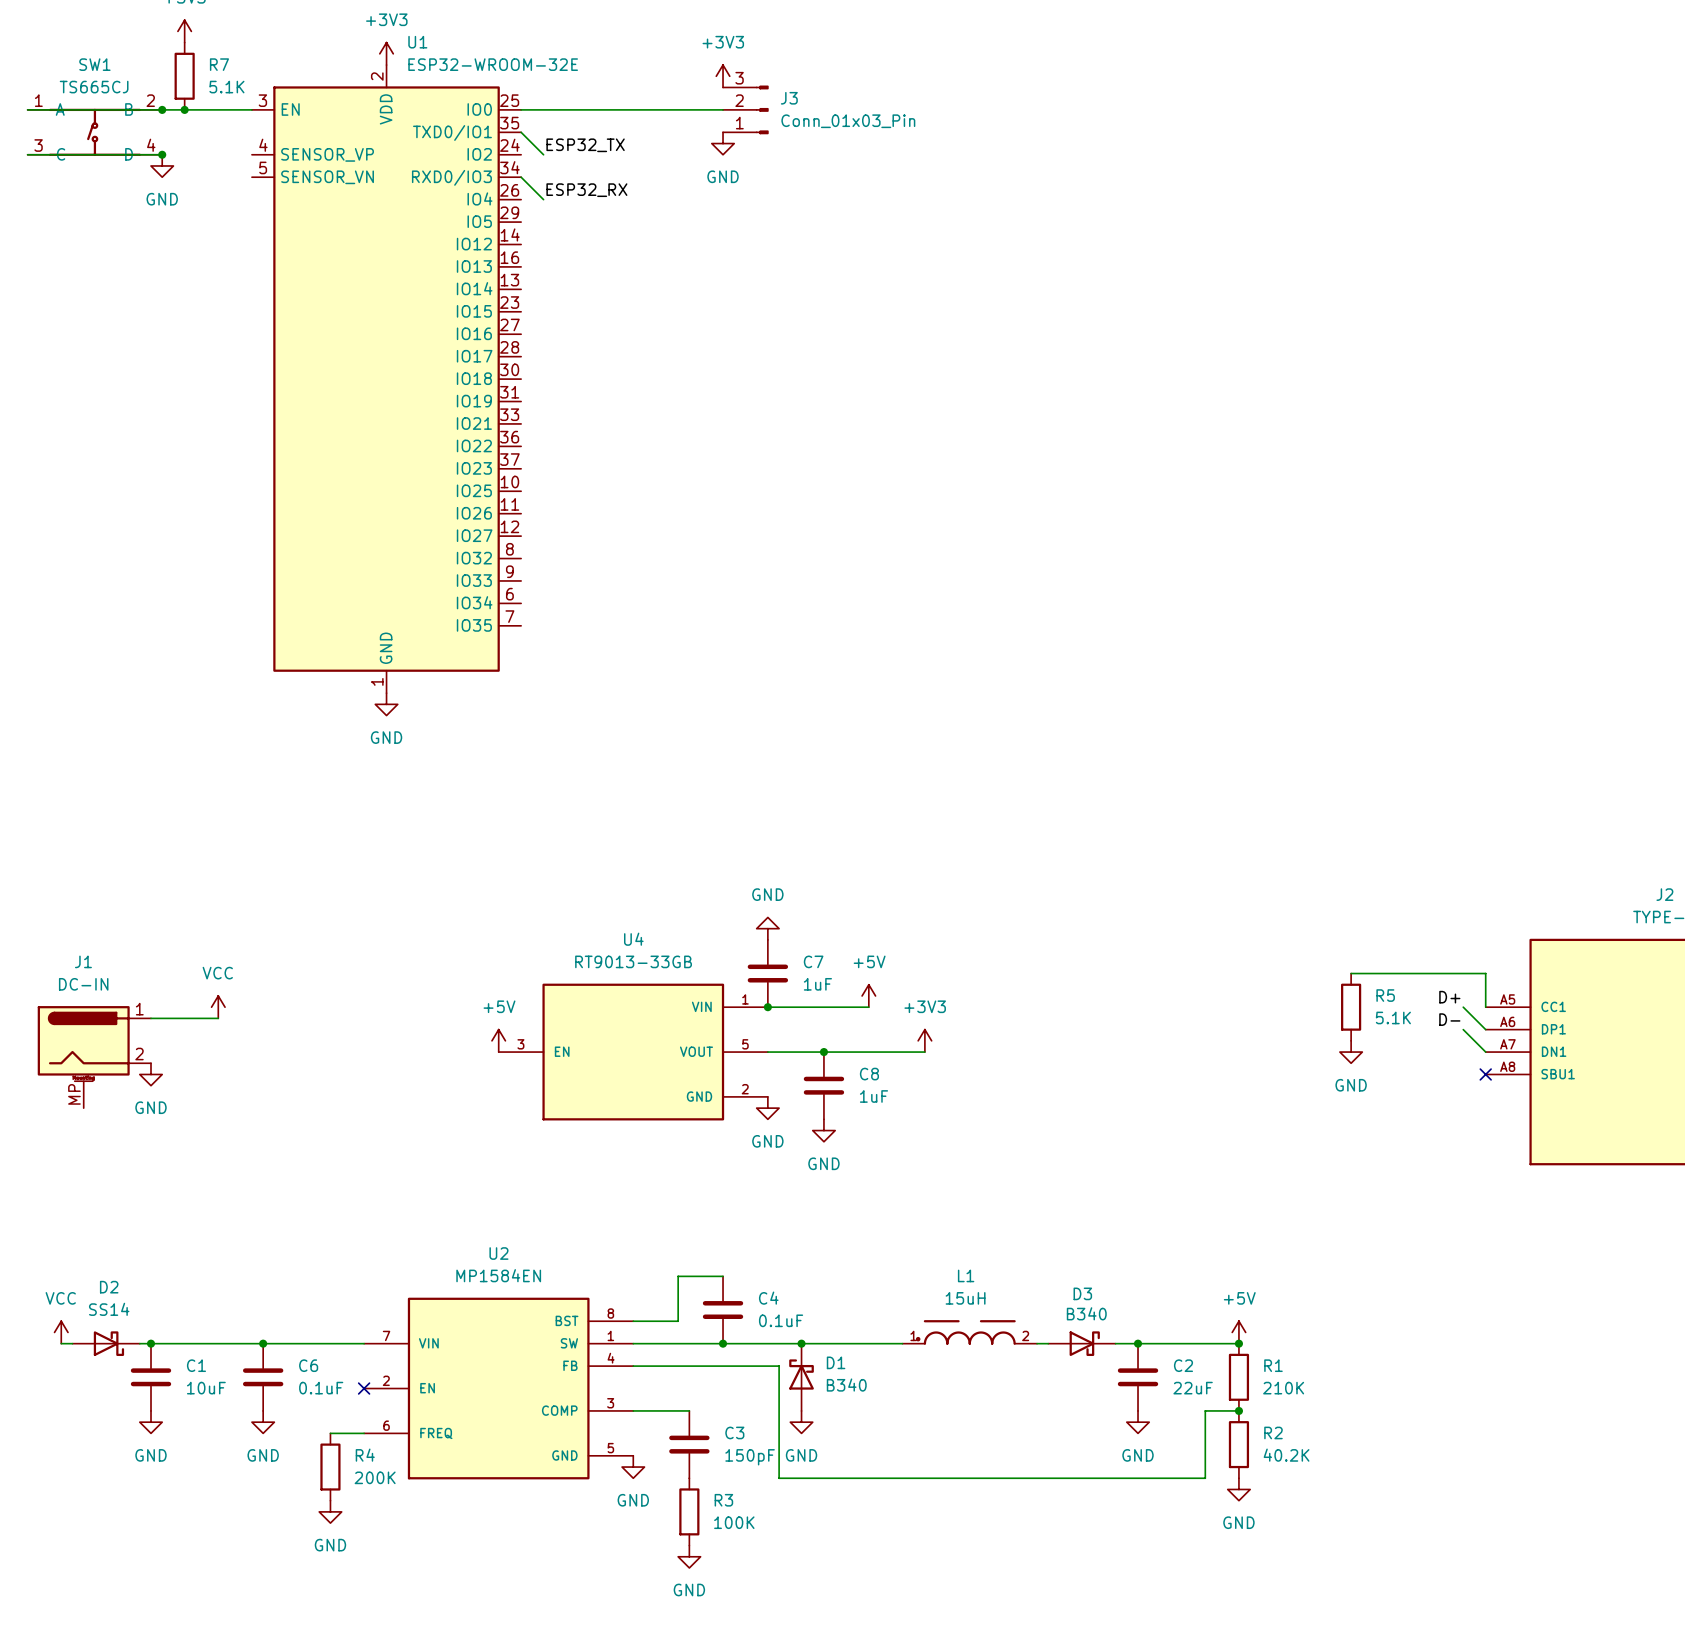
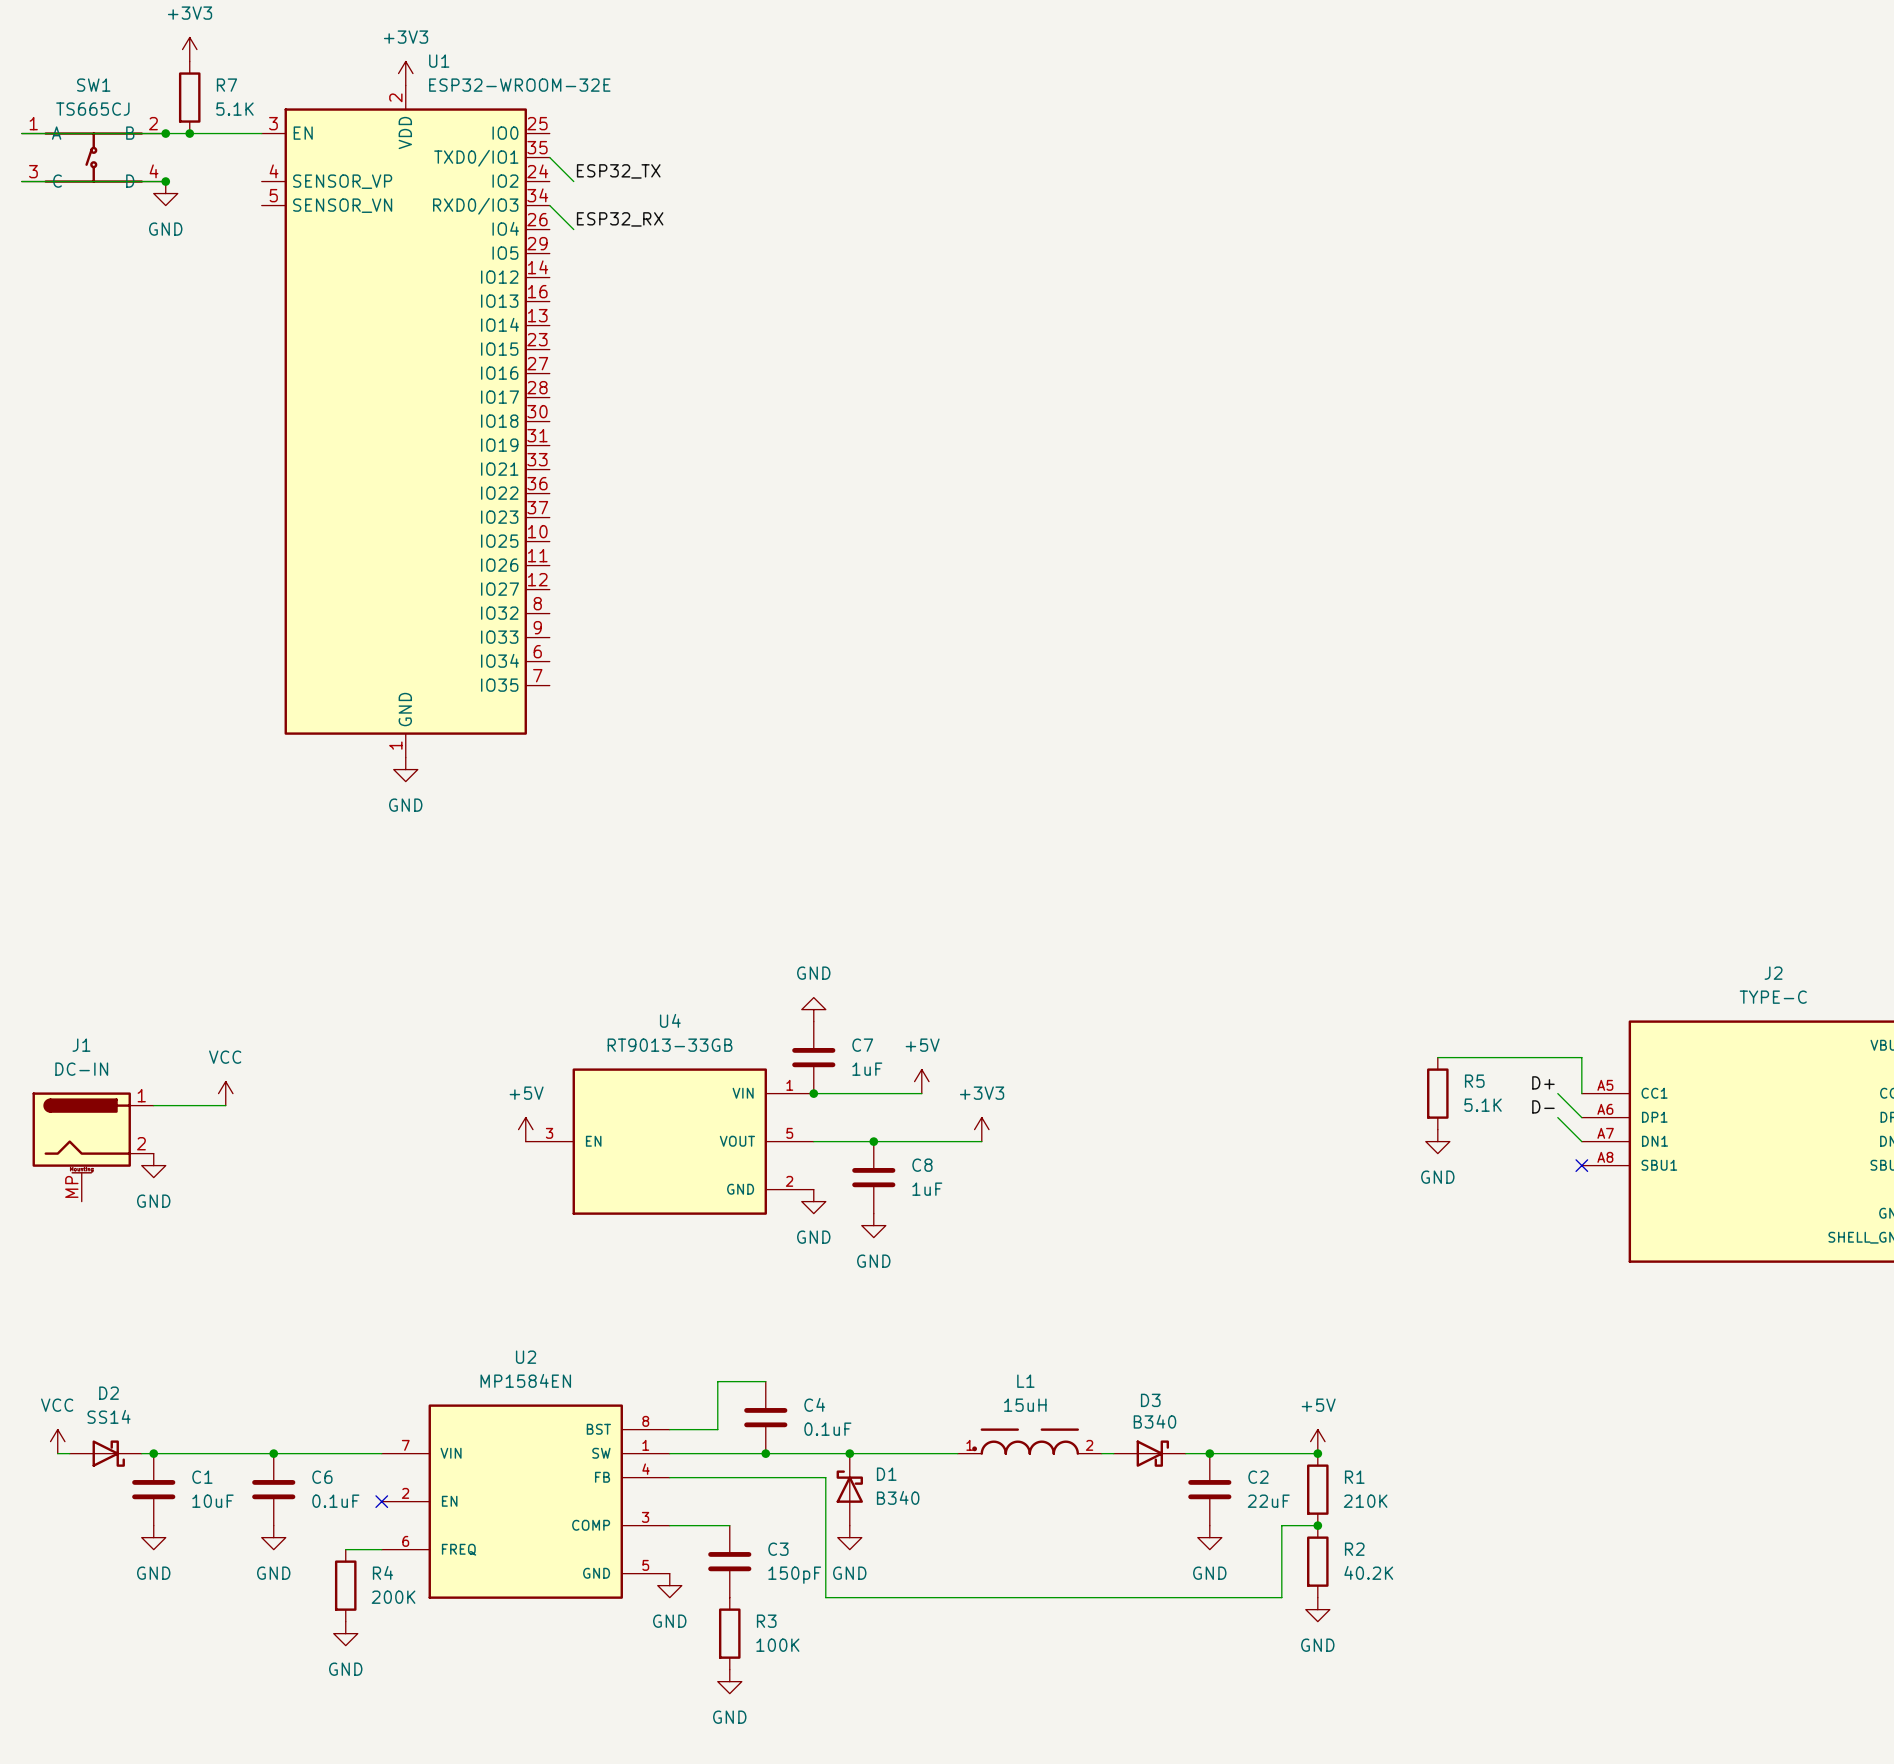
power symbol: +3V3 (723, 76) -> none
wire: (521, 109) (723, 109) -> none
J3: Conn_01x03_Pin (745, 109) -> none
power symbol: GND (723, 143) -> none

